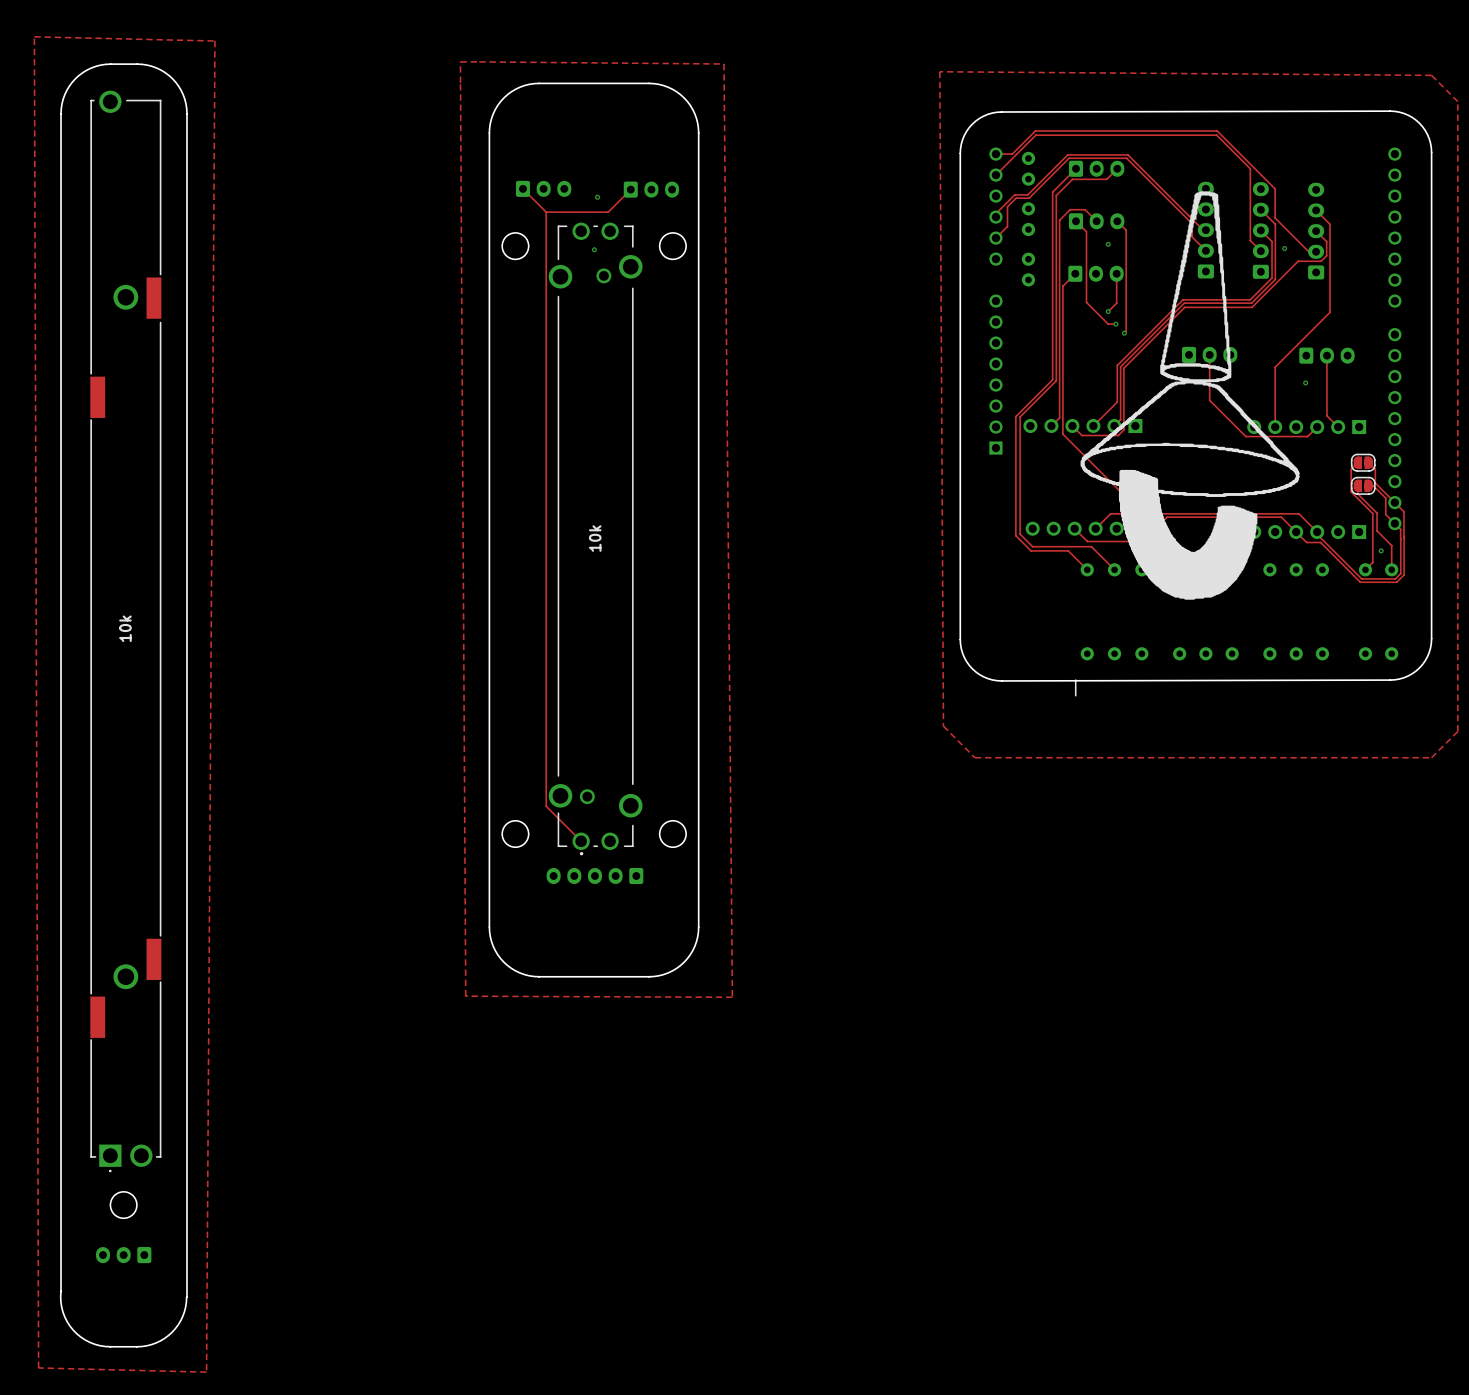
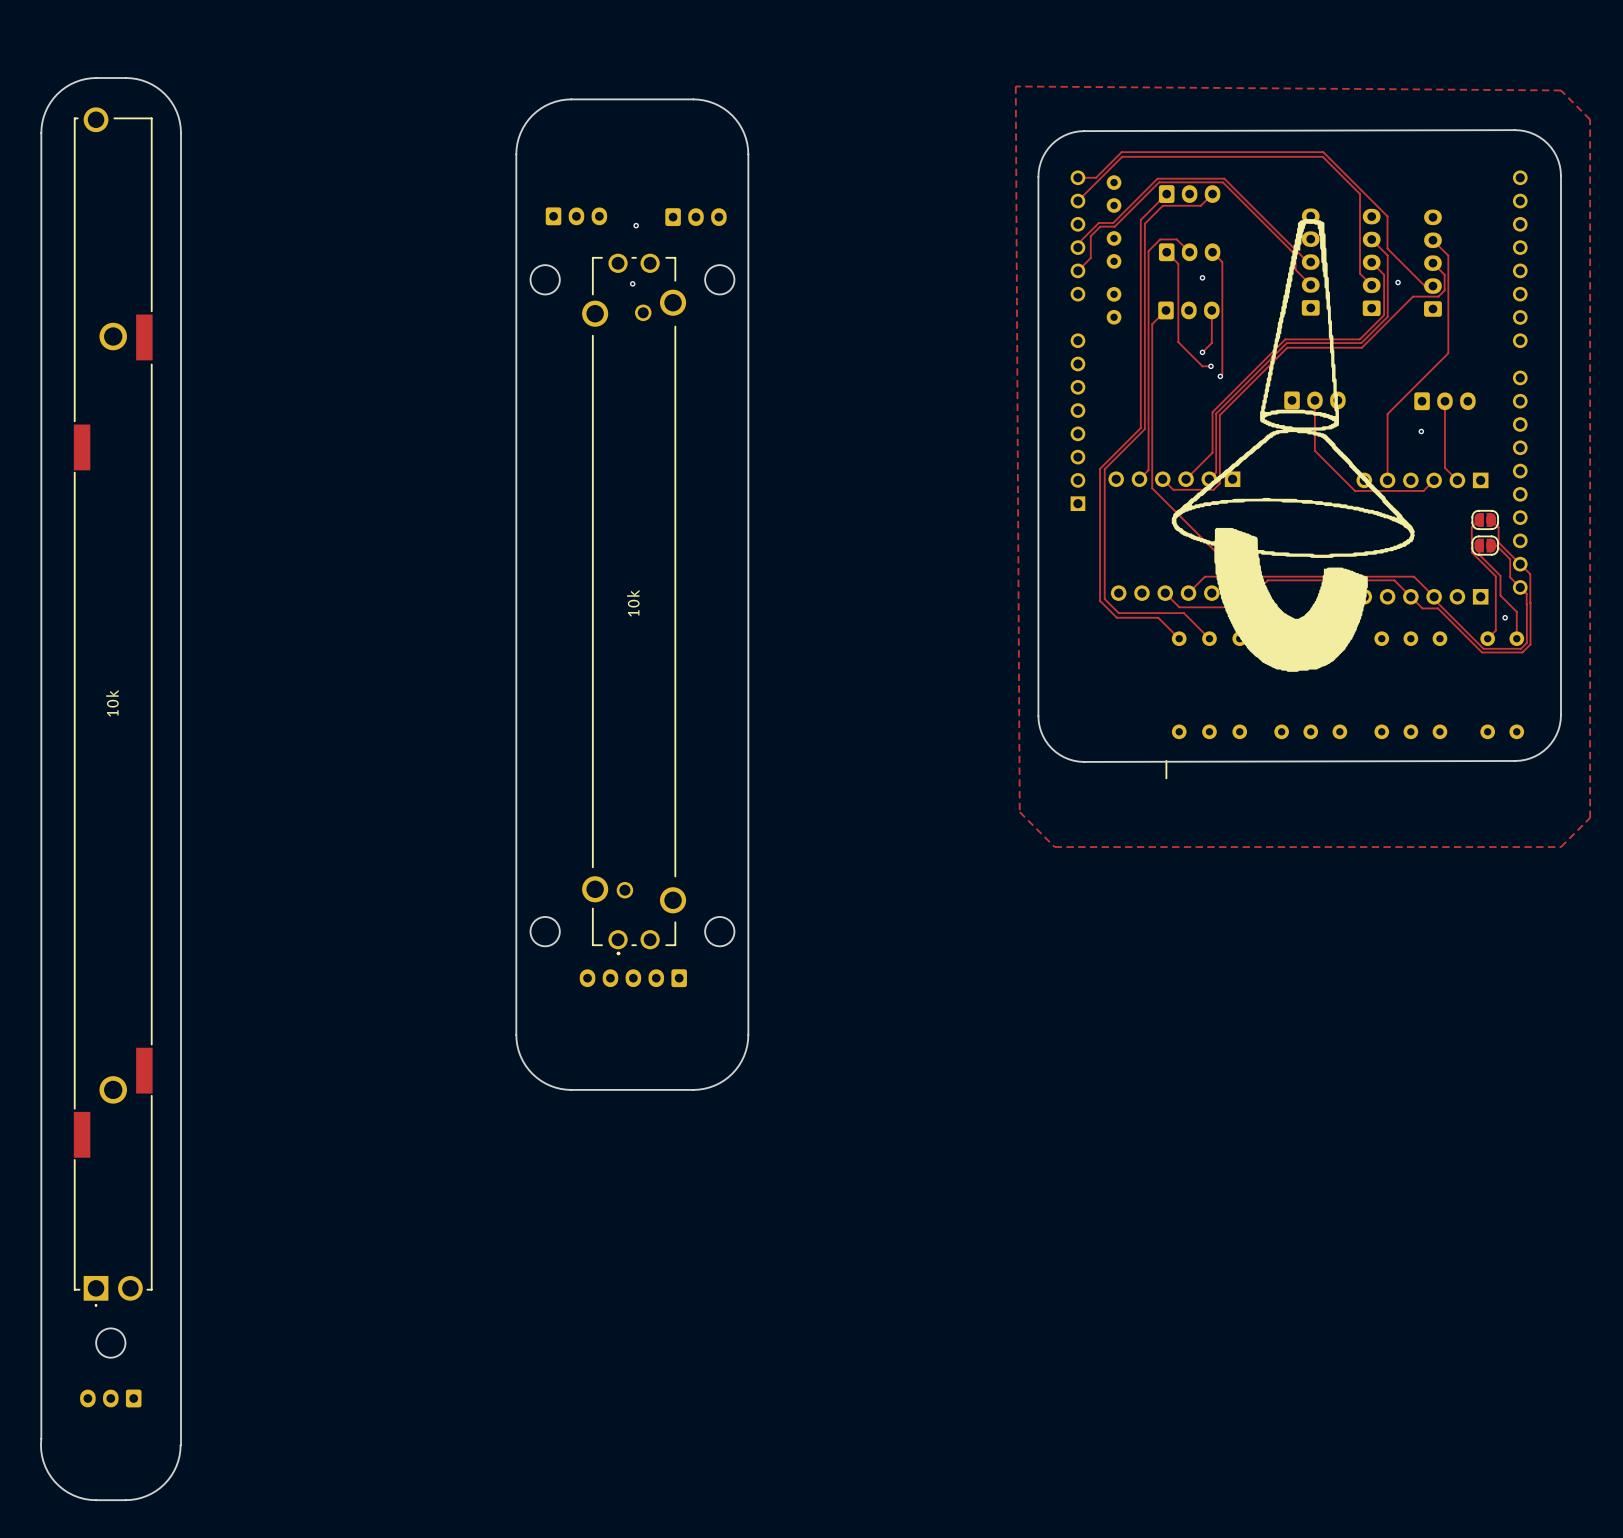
zone outline: (34, 36) (38, 1367) (206, 1372) (214, 41) (34, 36) -> none
zone outline: (460, 61) (465, 996) (732, 997) (724, 64) (460, 61) -> none
track: (522, 188) (546, 212) -> none
track: (630, 189) (608, 212) (546, 212) -> none
track: (546, 212) (546, 806) (581, 841) -> none

